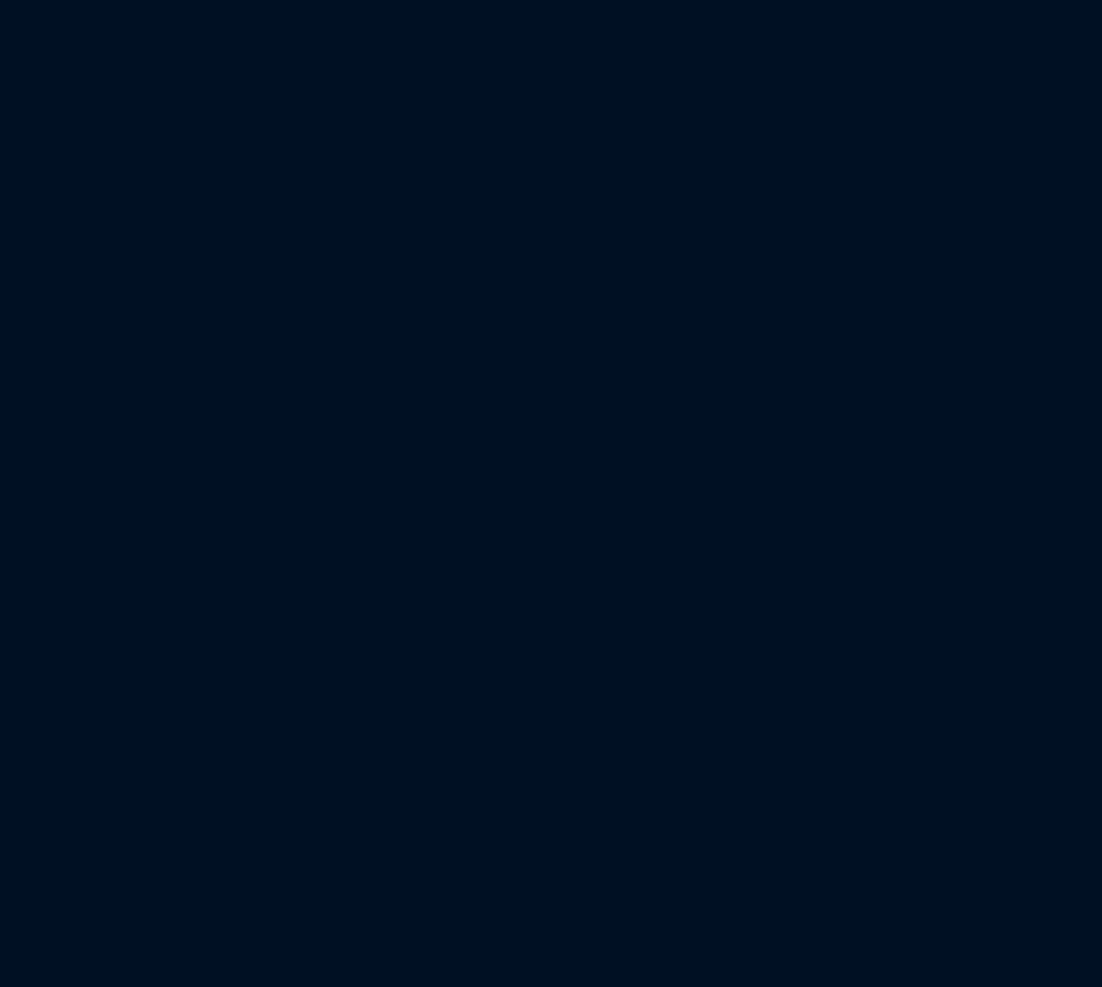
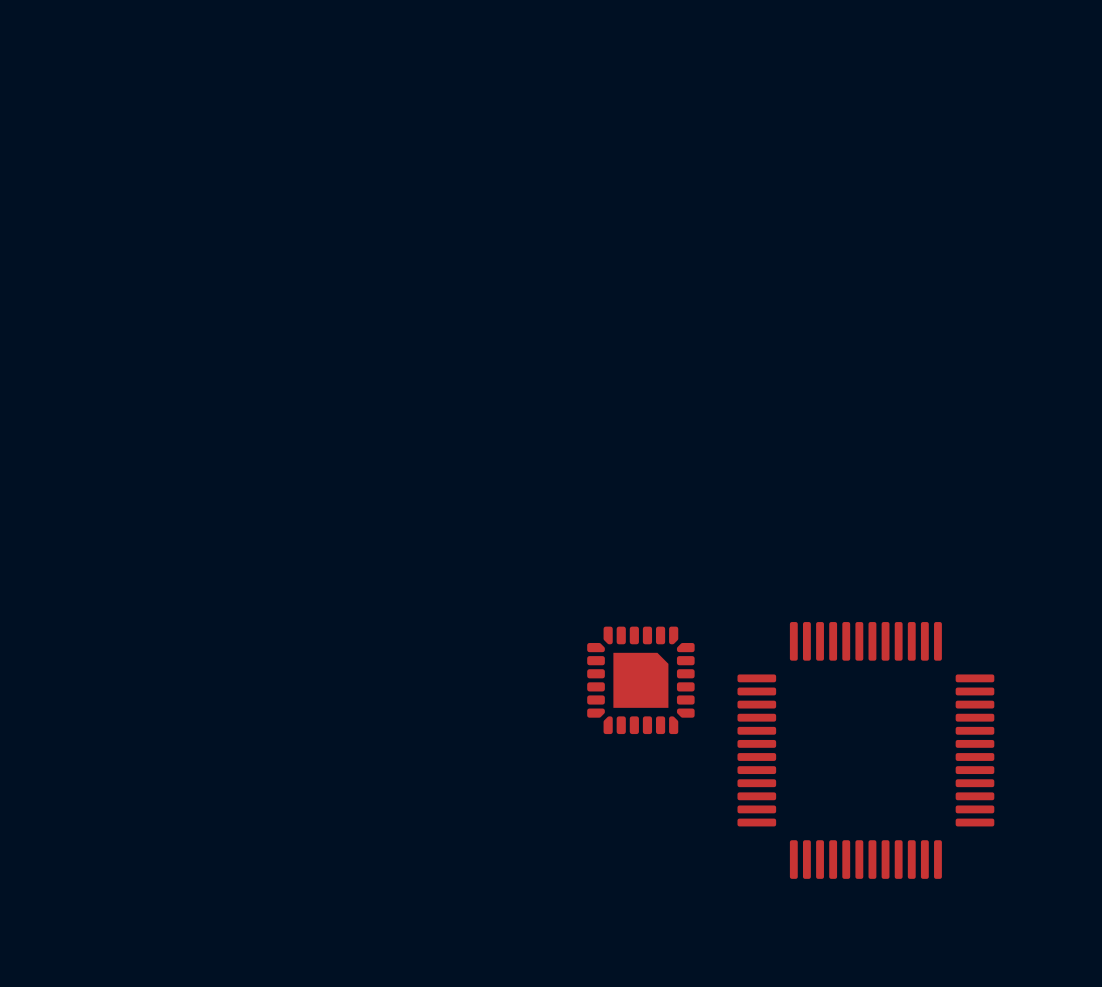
part: none -> (640, 680)
part: none -> (865, 750)

